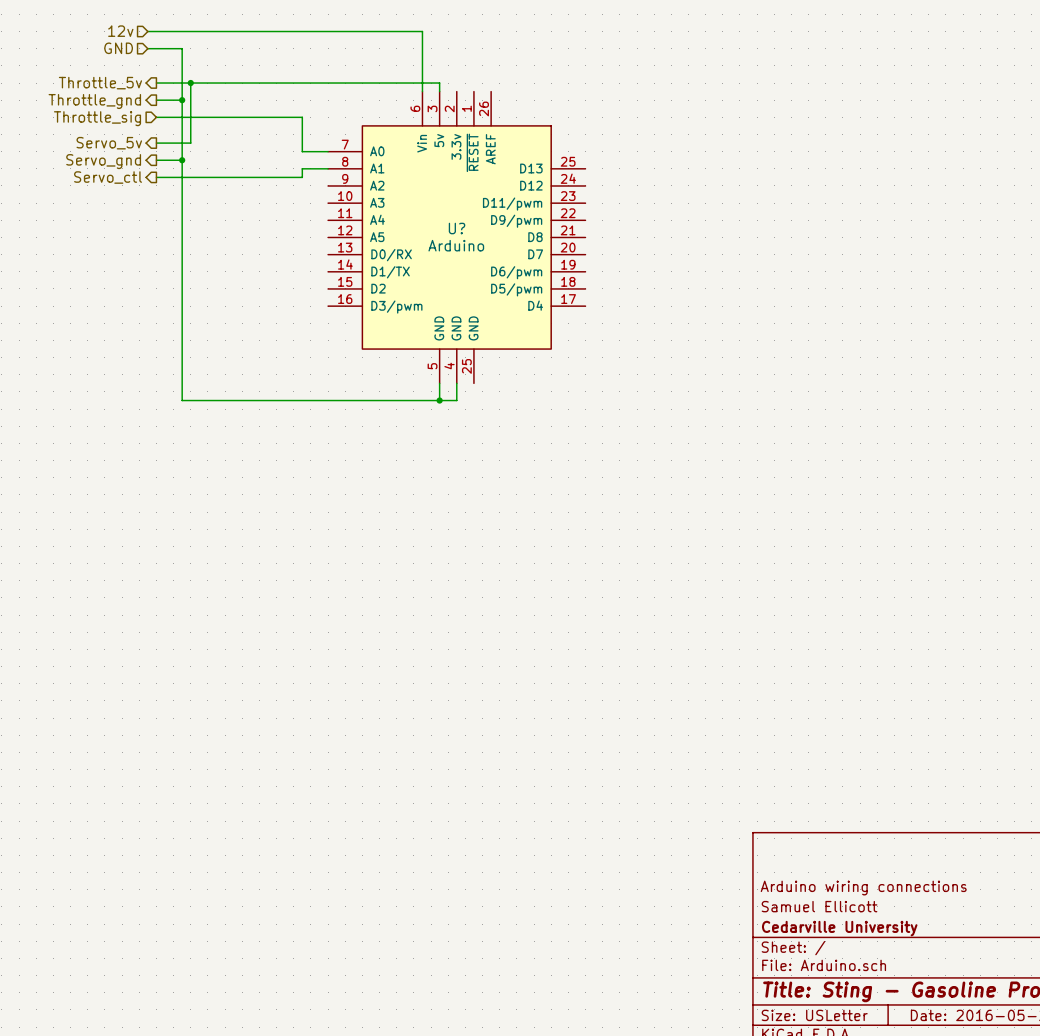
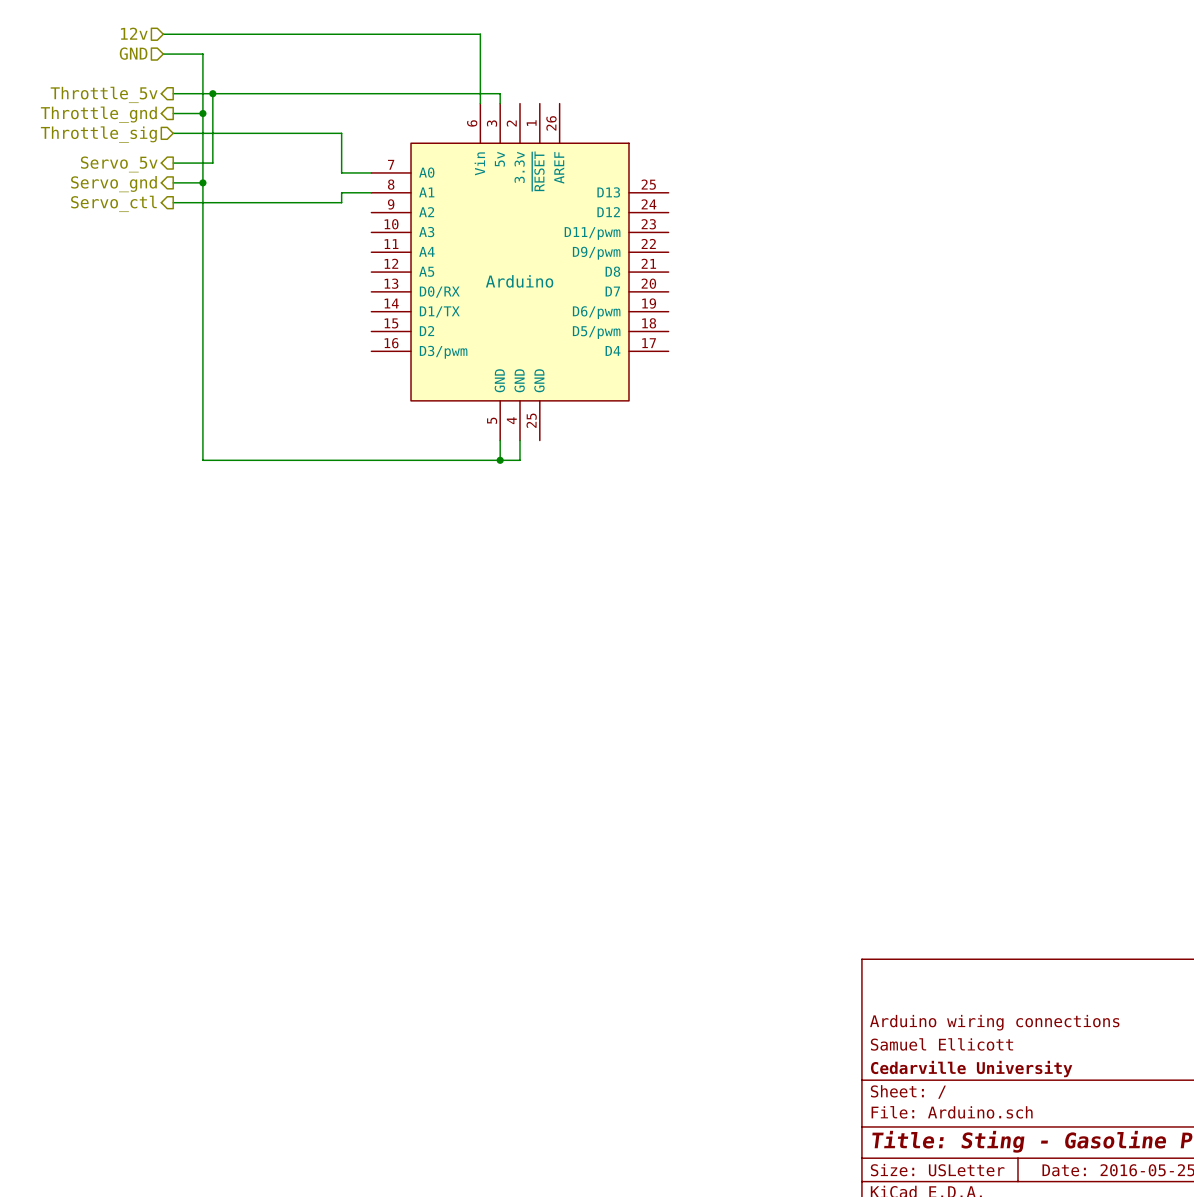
U? name: U? (457, 228) -> none

